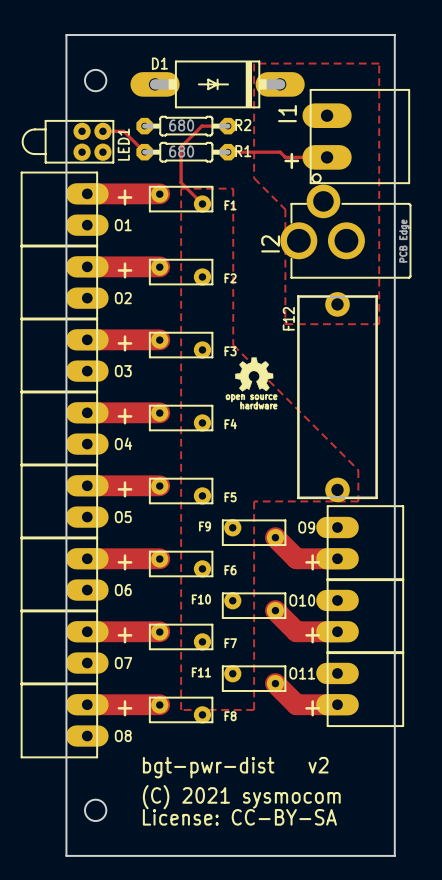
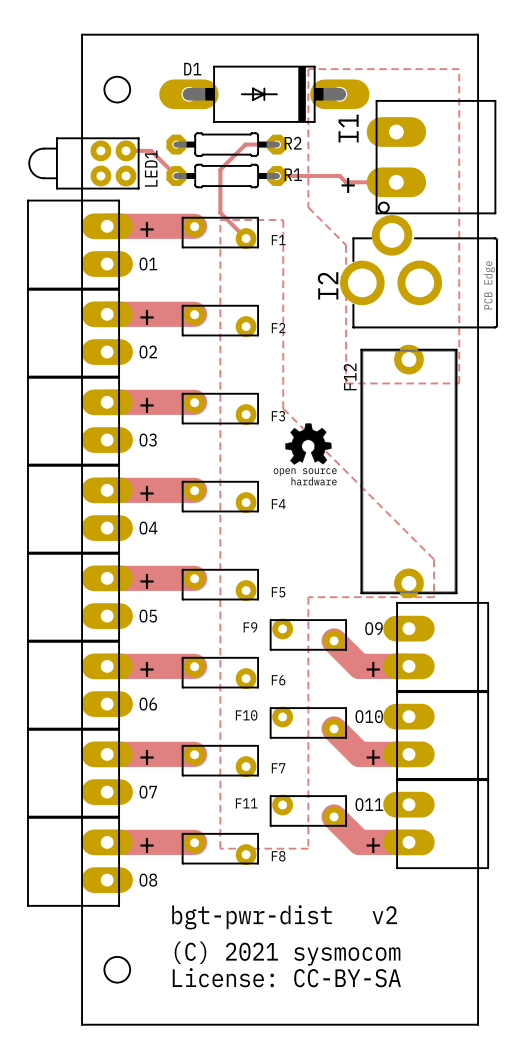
R2 value: 680 (181, 125) -> none
R1 value: 680 (181, 151) -> none

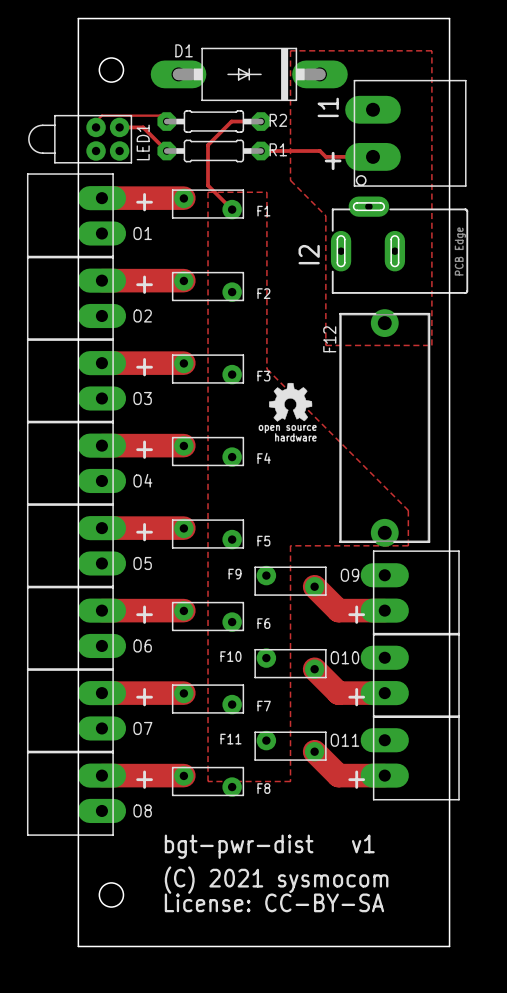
track: none -> (166, 121) (160, 115) (101, 115) (96, 121) (96, 127)
I2 footprint: [340, 215, 498, 329] -> [330, 196, 469, 294]
text: v2 (384, 915) -> v1 (363, 843)

